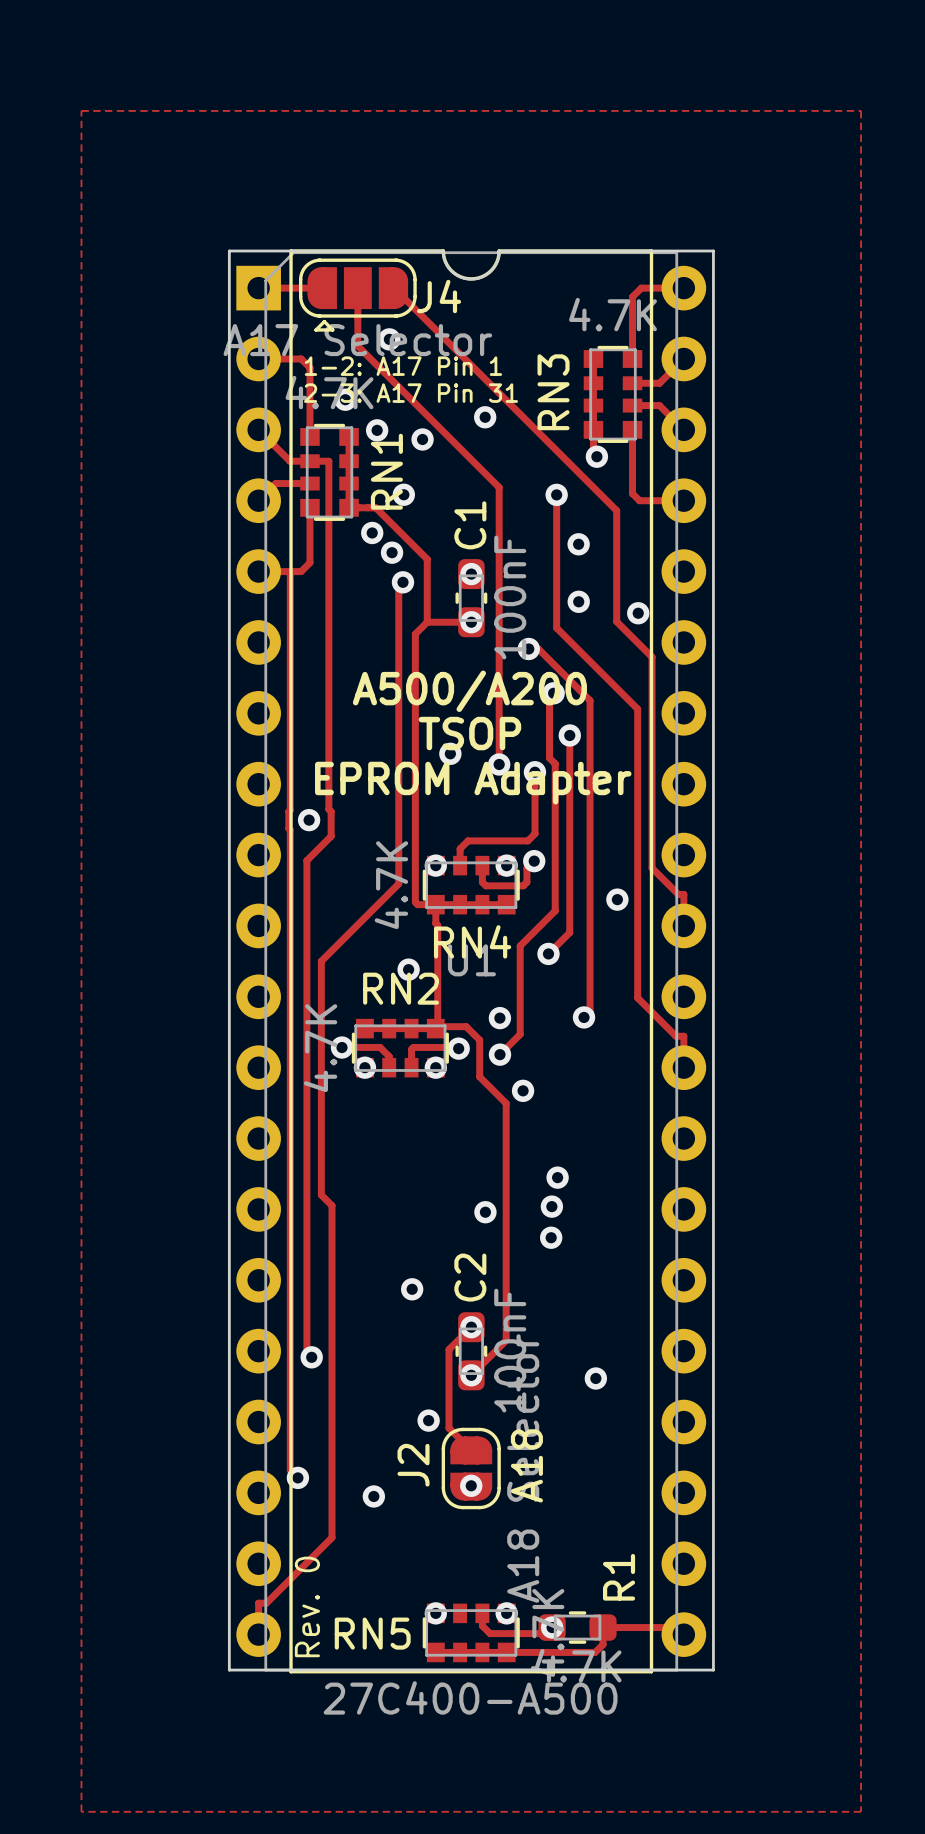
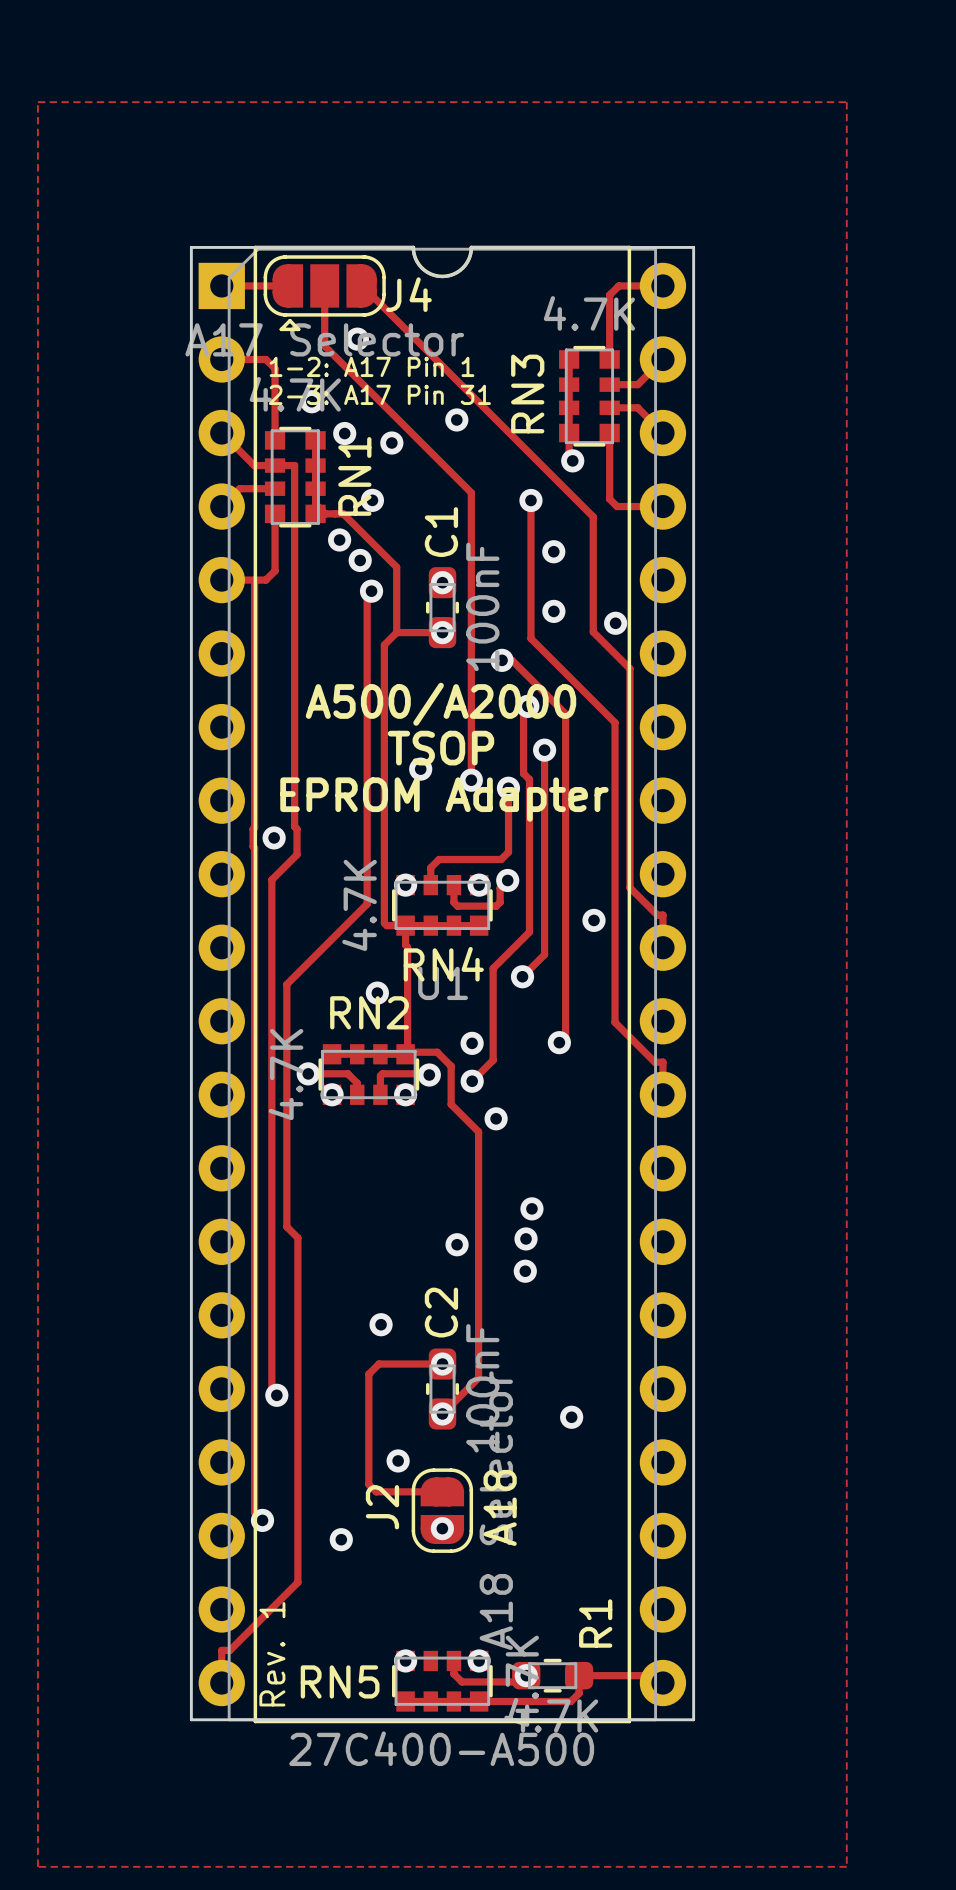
text: A500/A200 (469, 691) -> A500/A2000 (440, 704)
track: (471, 1327) (449, 1349) (449, 1428) (471, 1450) -> (442, 1364) (379, 1364) (368, 1374) (368, 1484) (376, 1491) (442, 1491)
text: Rev. 0 (307, 1606) -> Rev. 1 (272, 1654)

